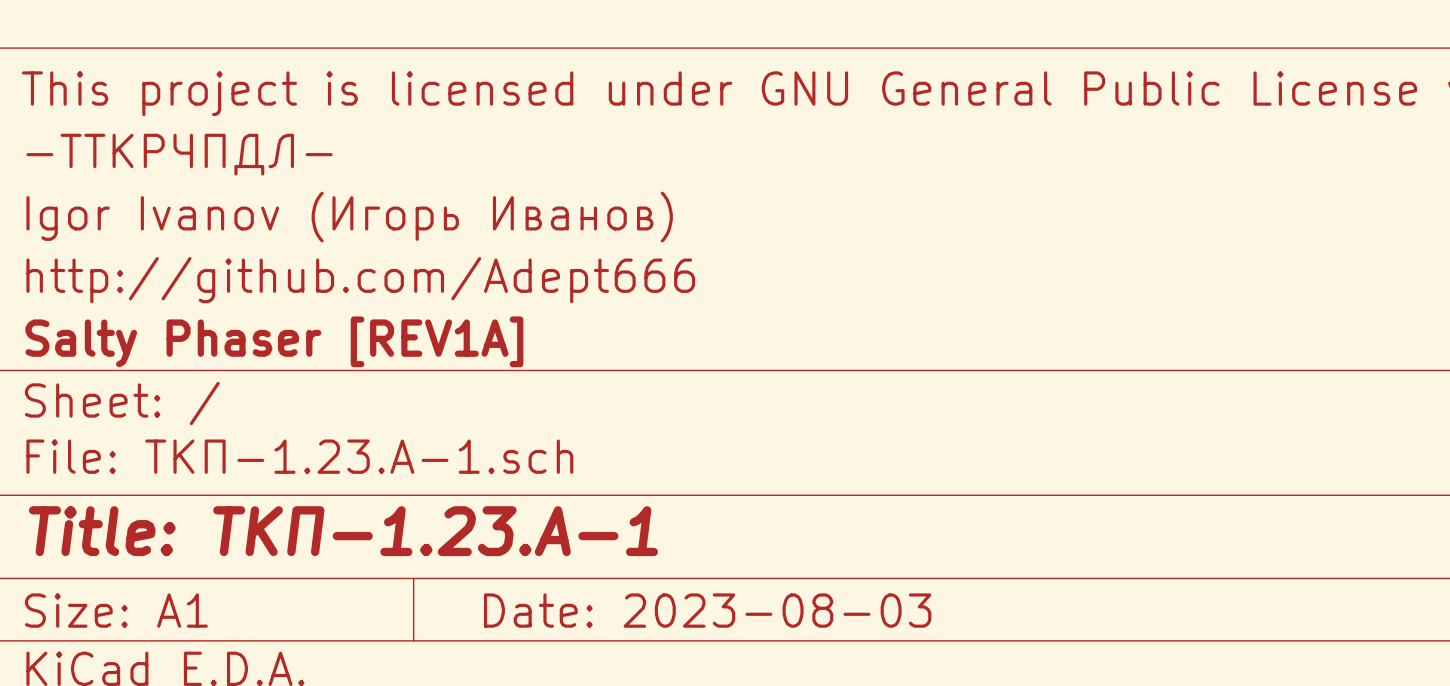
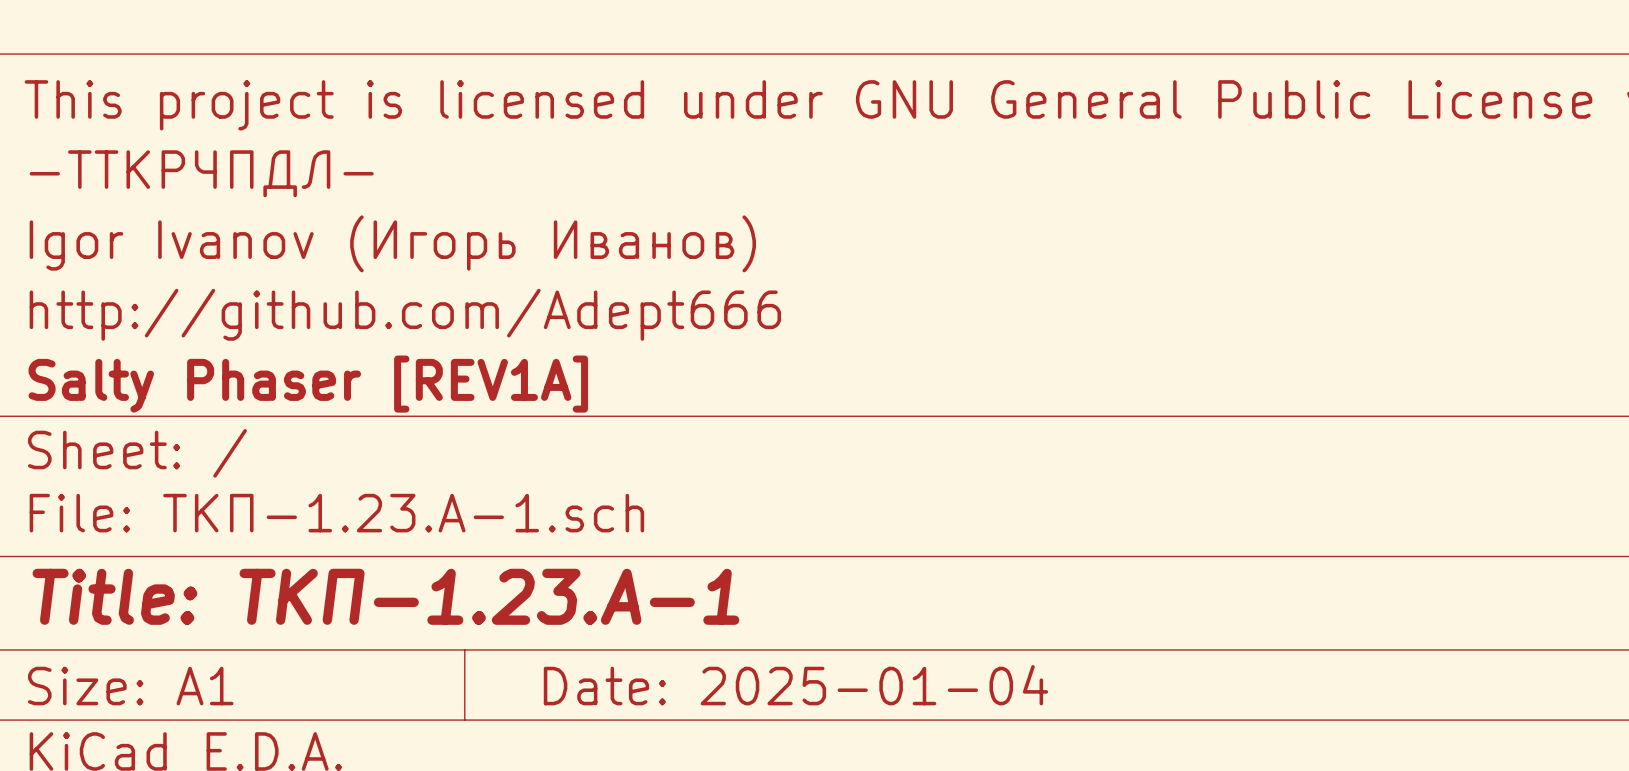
title block: Date: 2023-08-03 (707, 610) -> Date: 2025-01-04 (795, 685)

